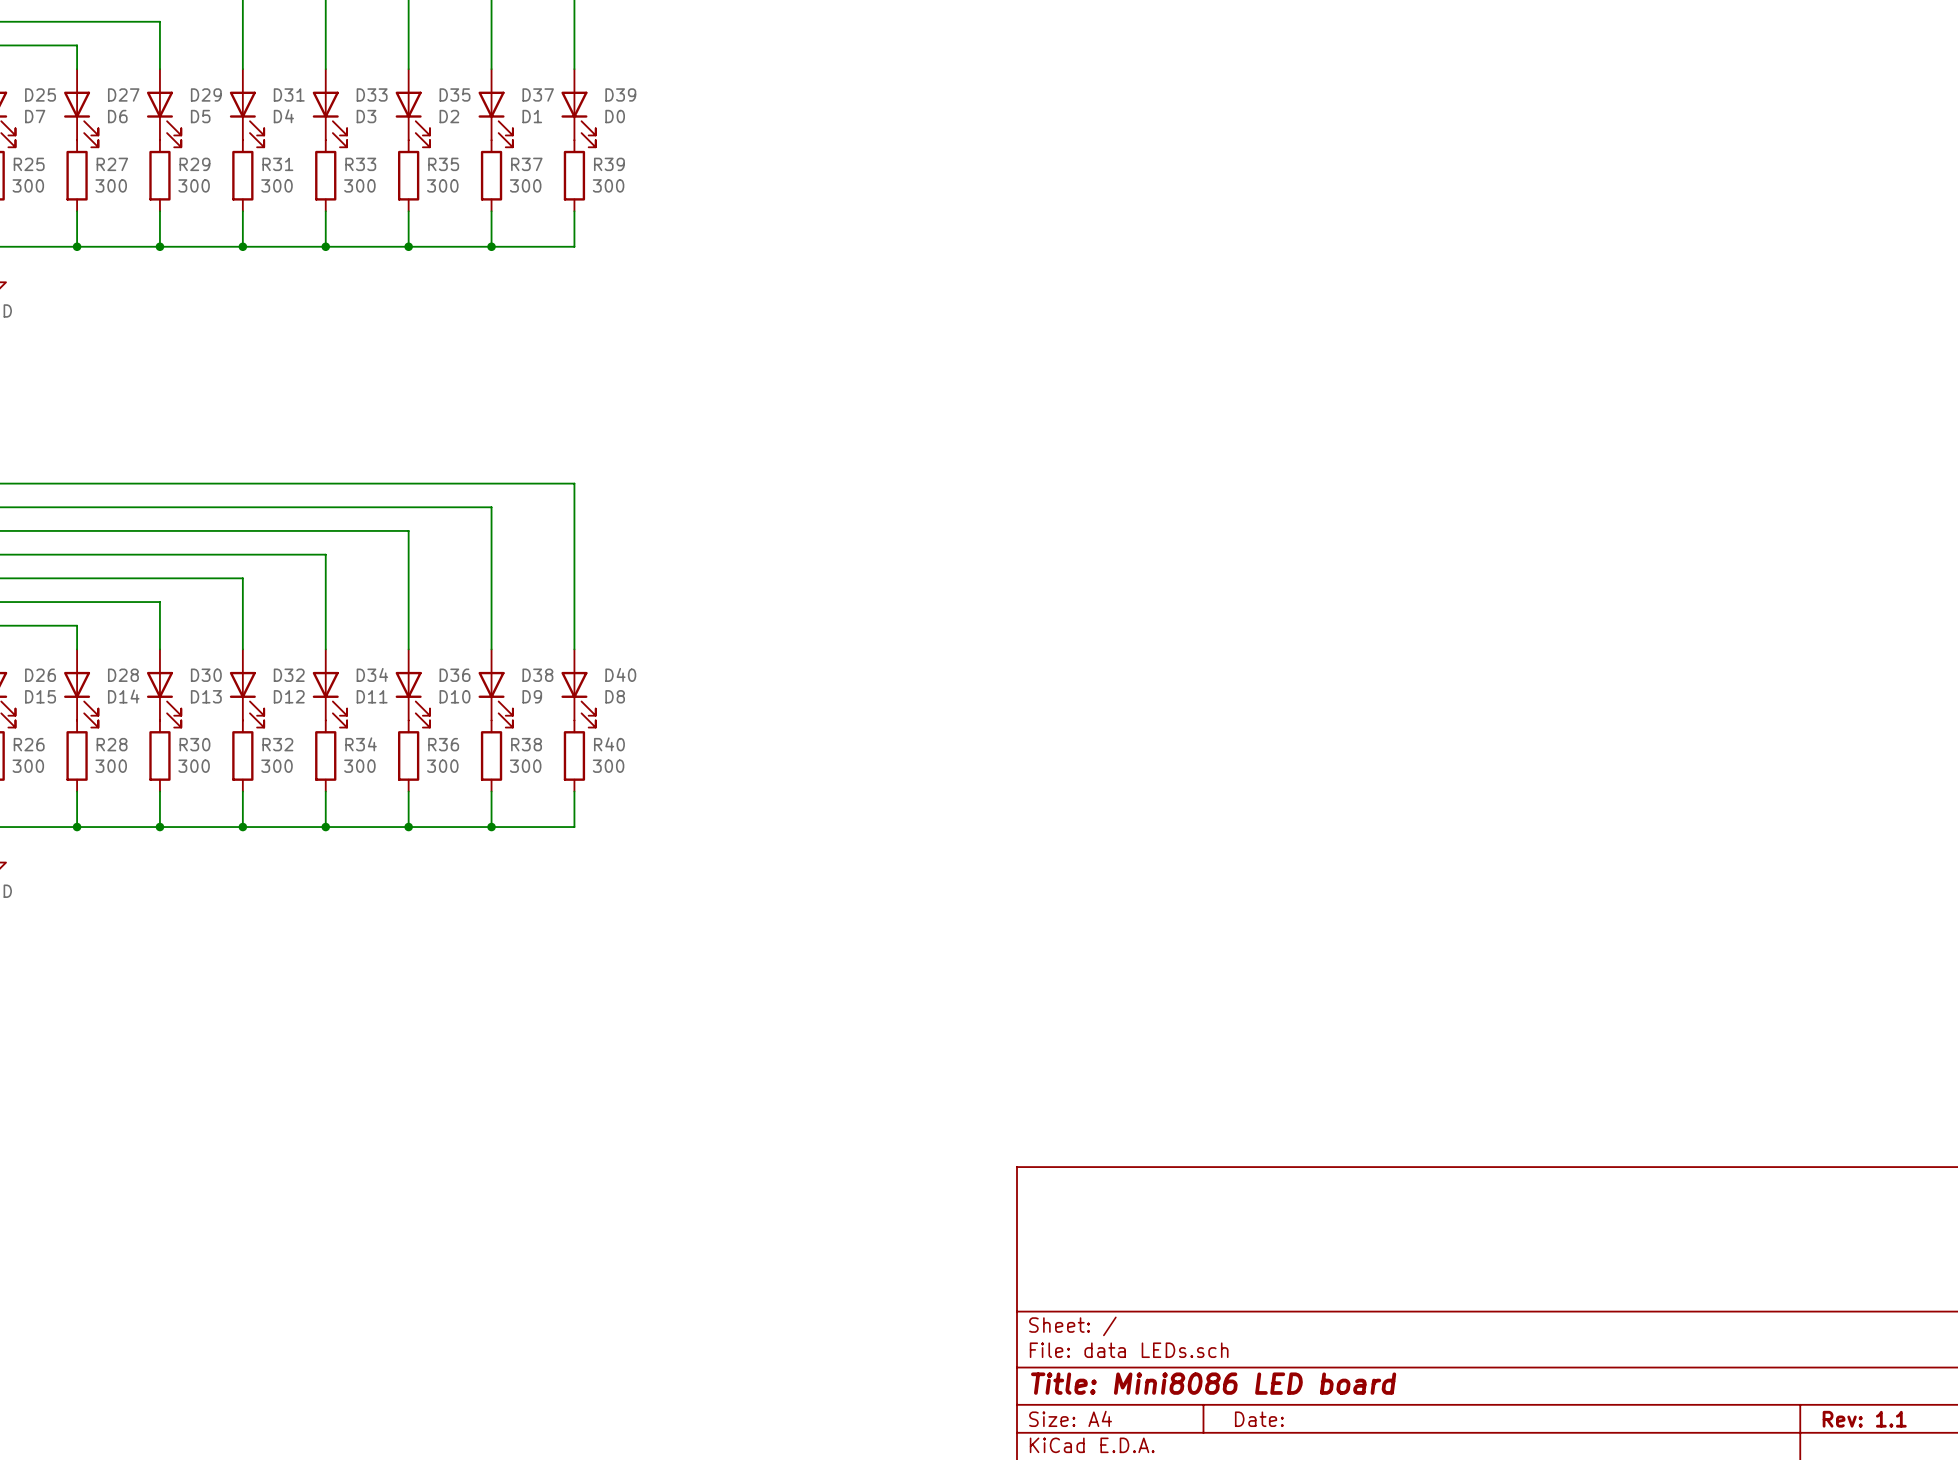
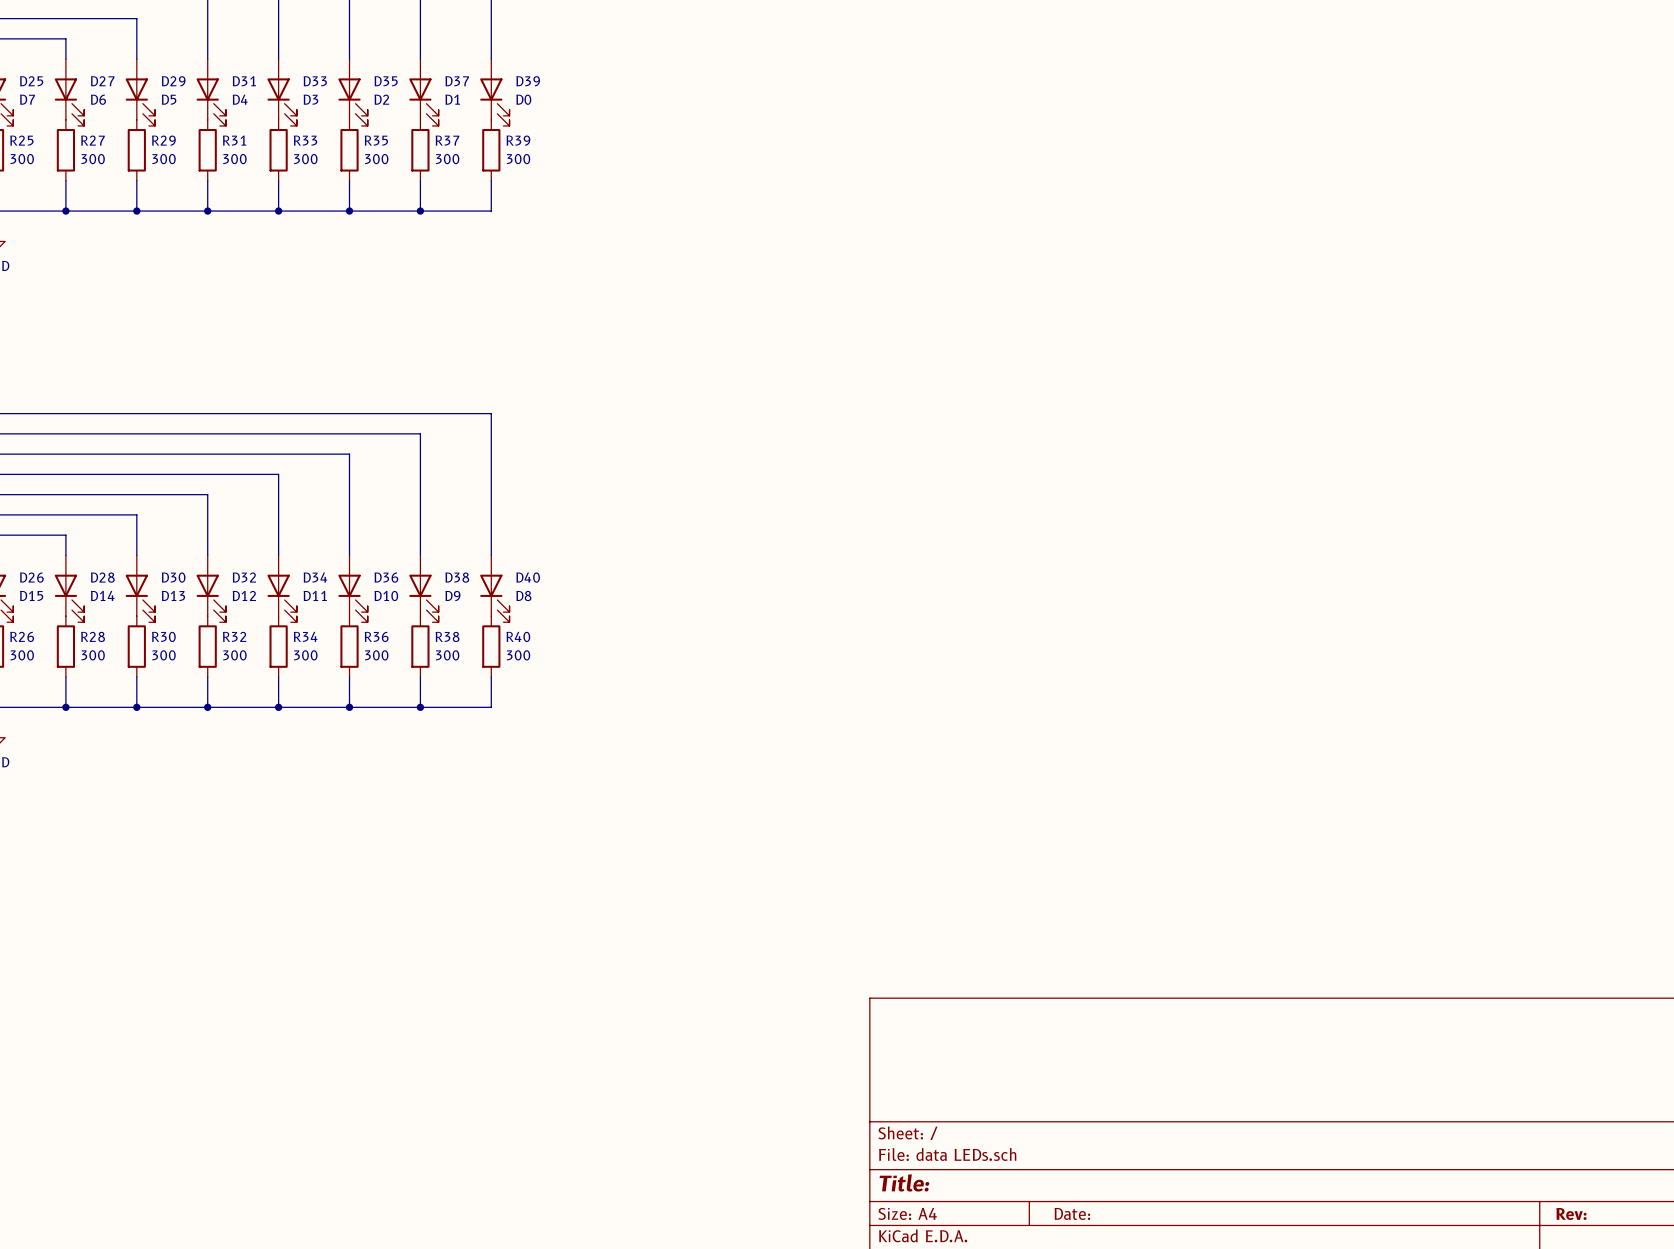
title block: Title: Mini8086 LED board (1213, 1383) -> Title: (904, 1182)
title block: Rev: 1.1 (1864, 1419) -> Rev: (1571, 1214)

